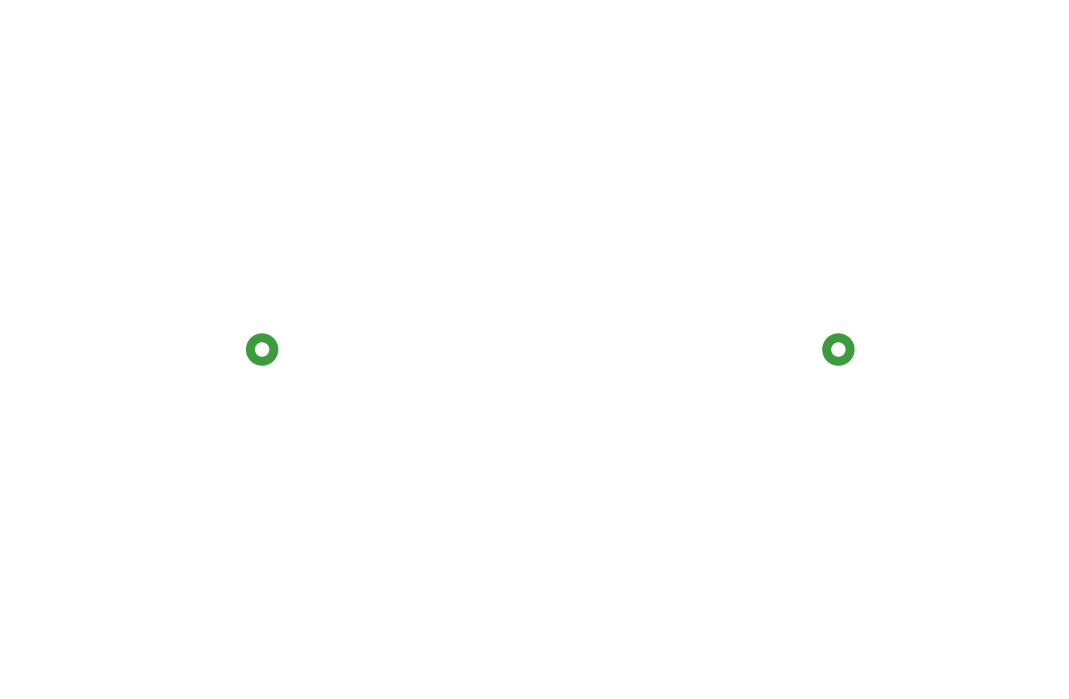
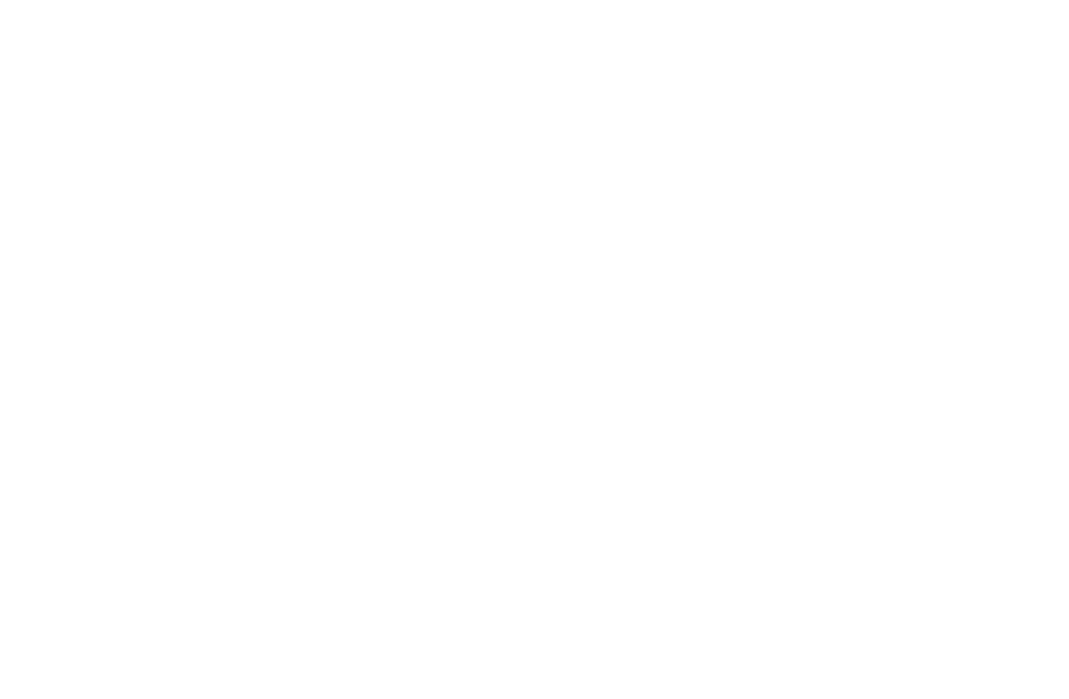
via: (262, 349) -> none
via: (838, 349) -> none

